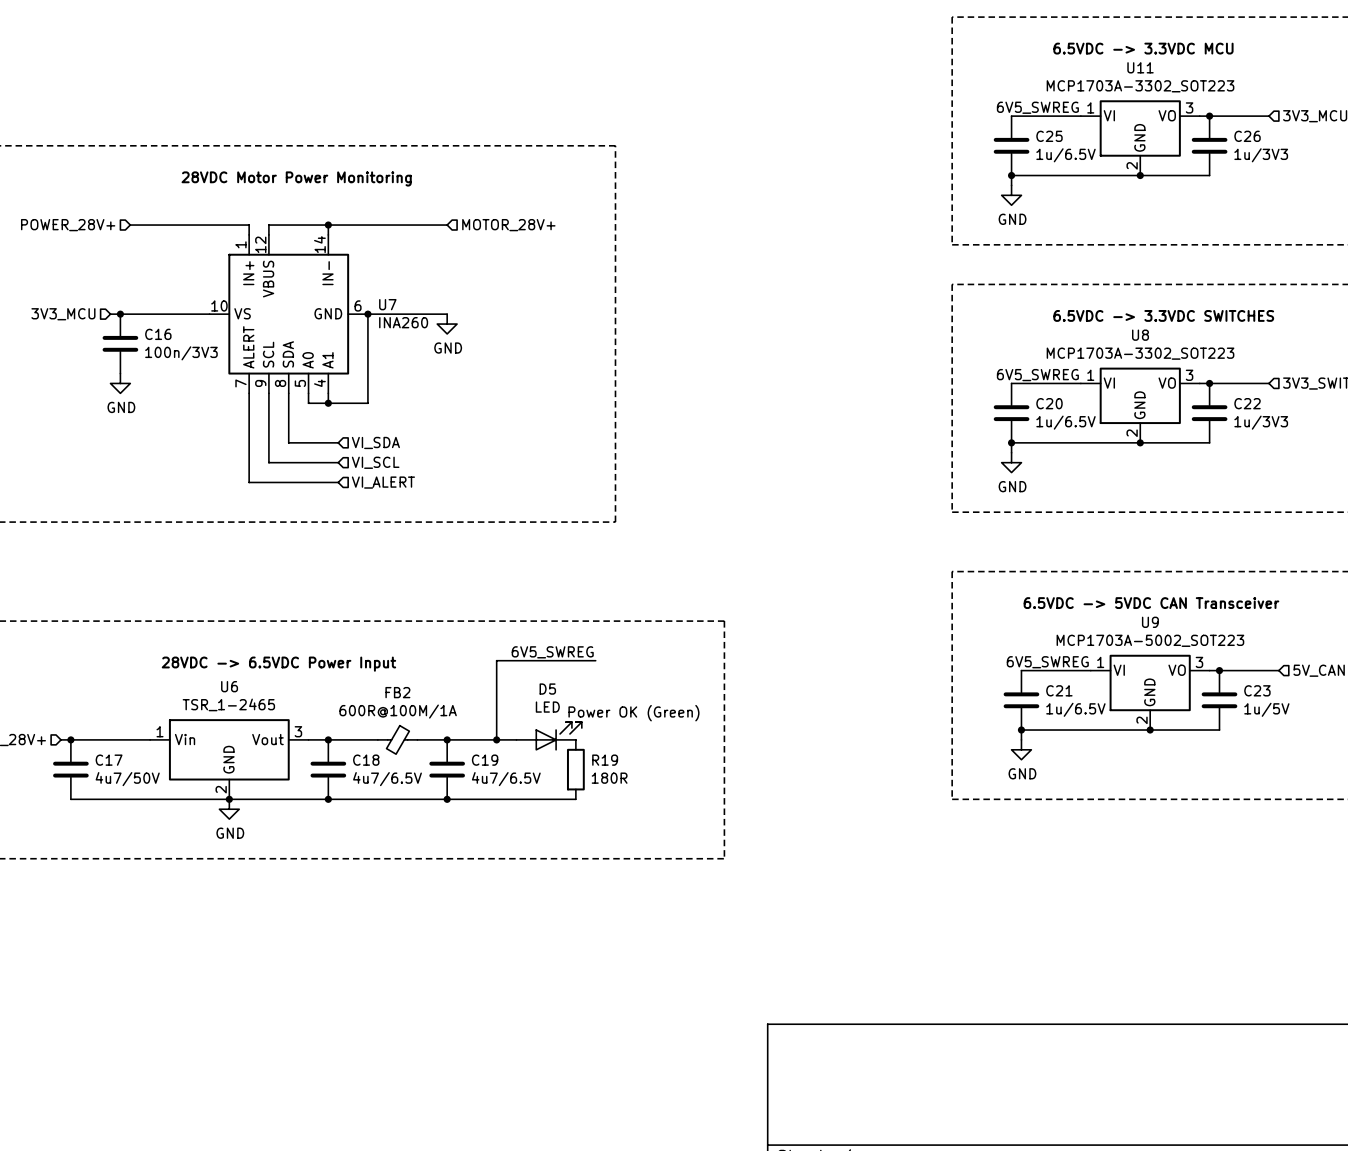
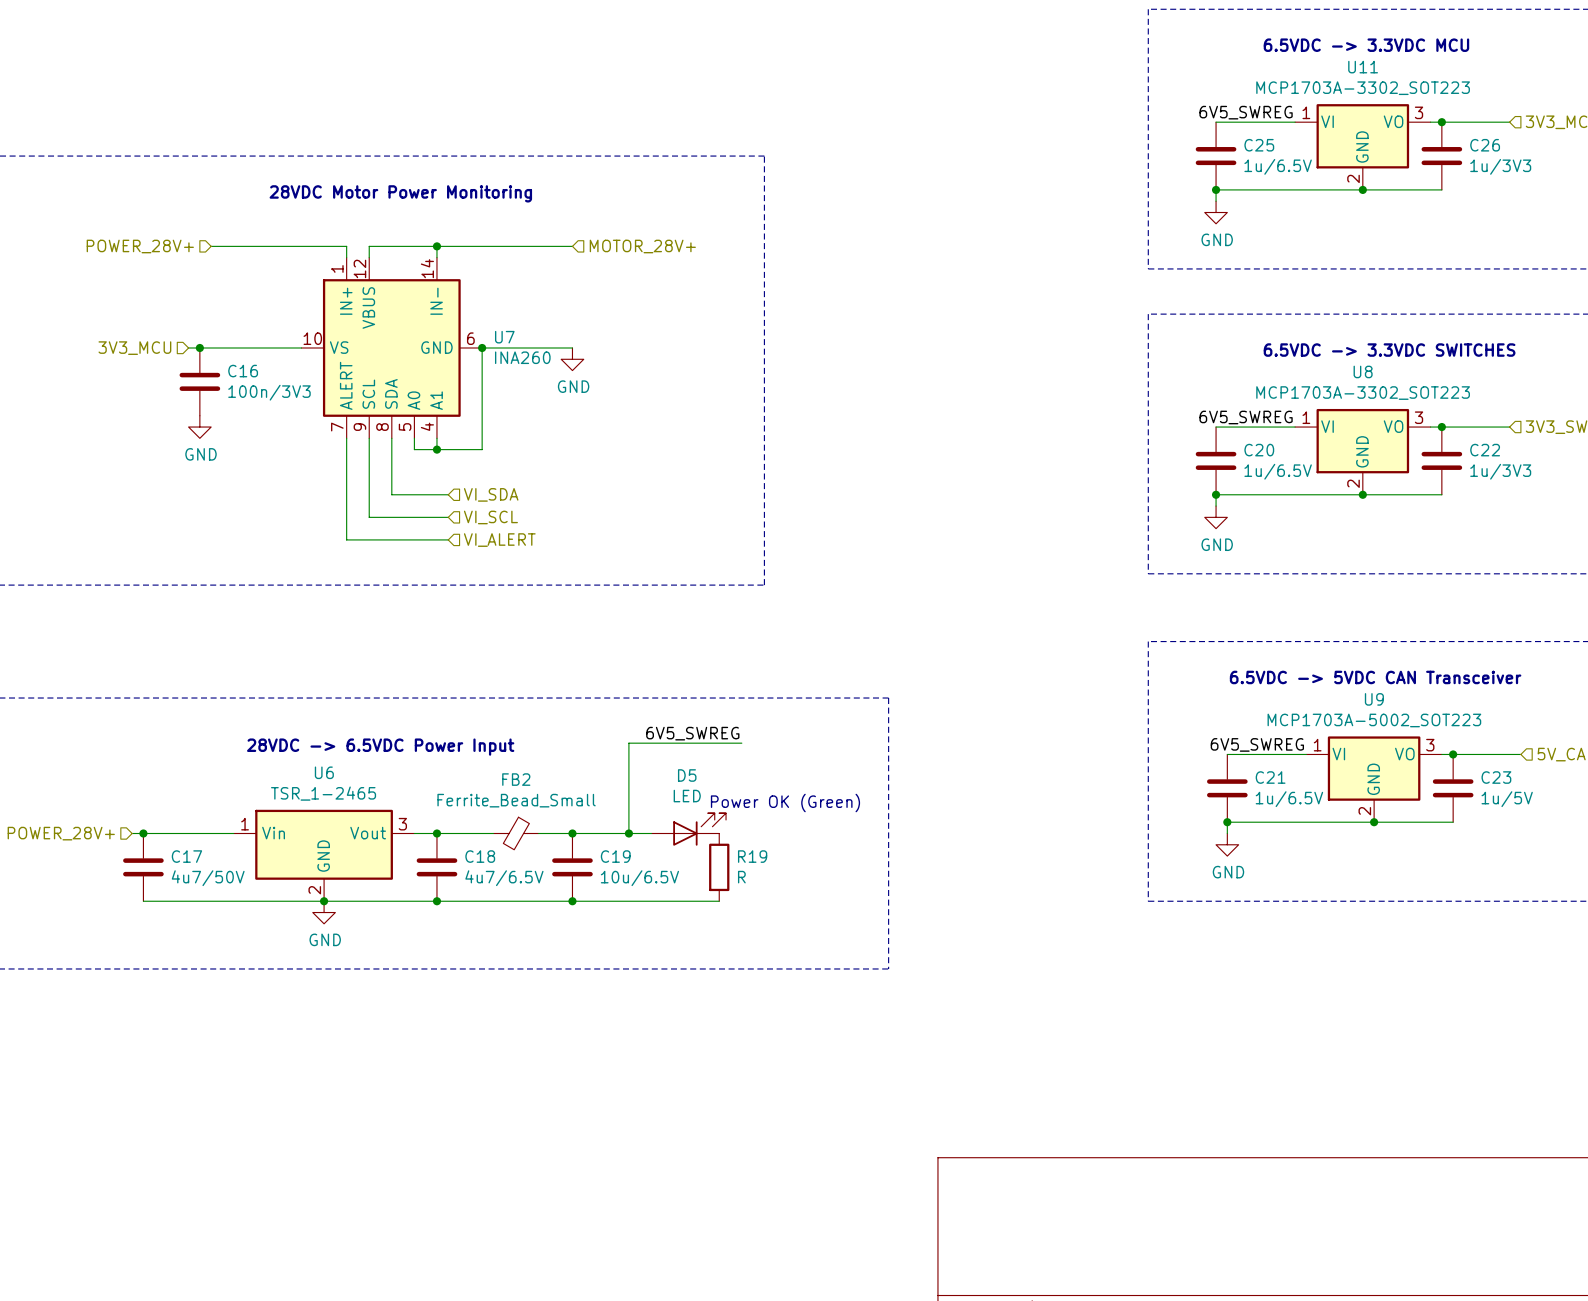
FB2 value: 600R@100M/1A (398, 711) -> Ferrite_Bead_Small (516, 800)
R19 value: 180R (609, 778) -> R (741, 877)
C19 value: 4u7/6.5V (506, 779) -> 10u/6.5V (639, 878)

